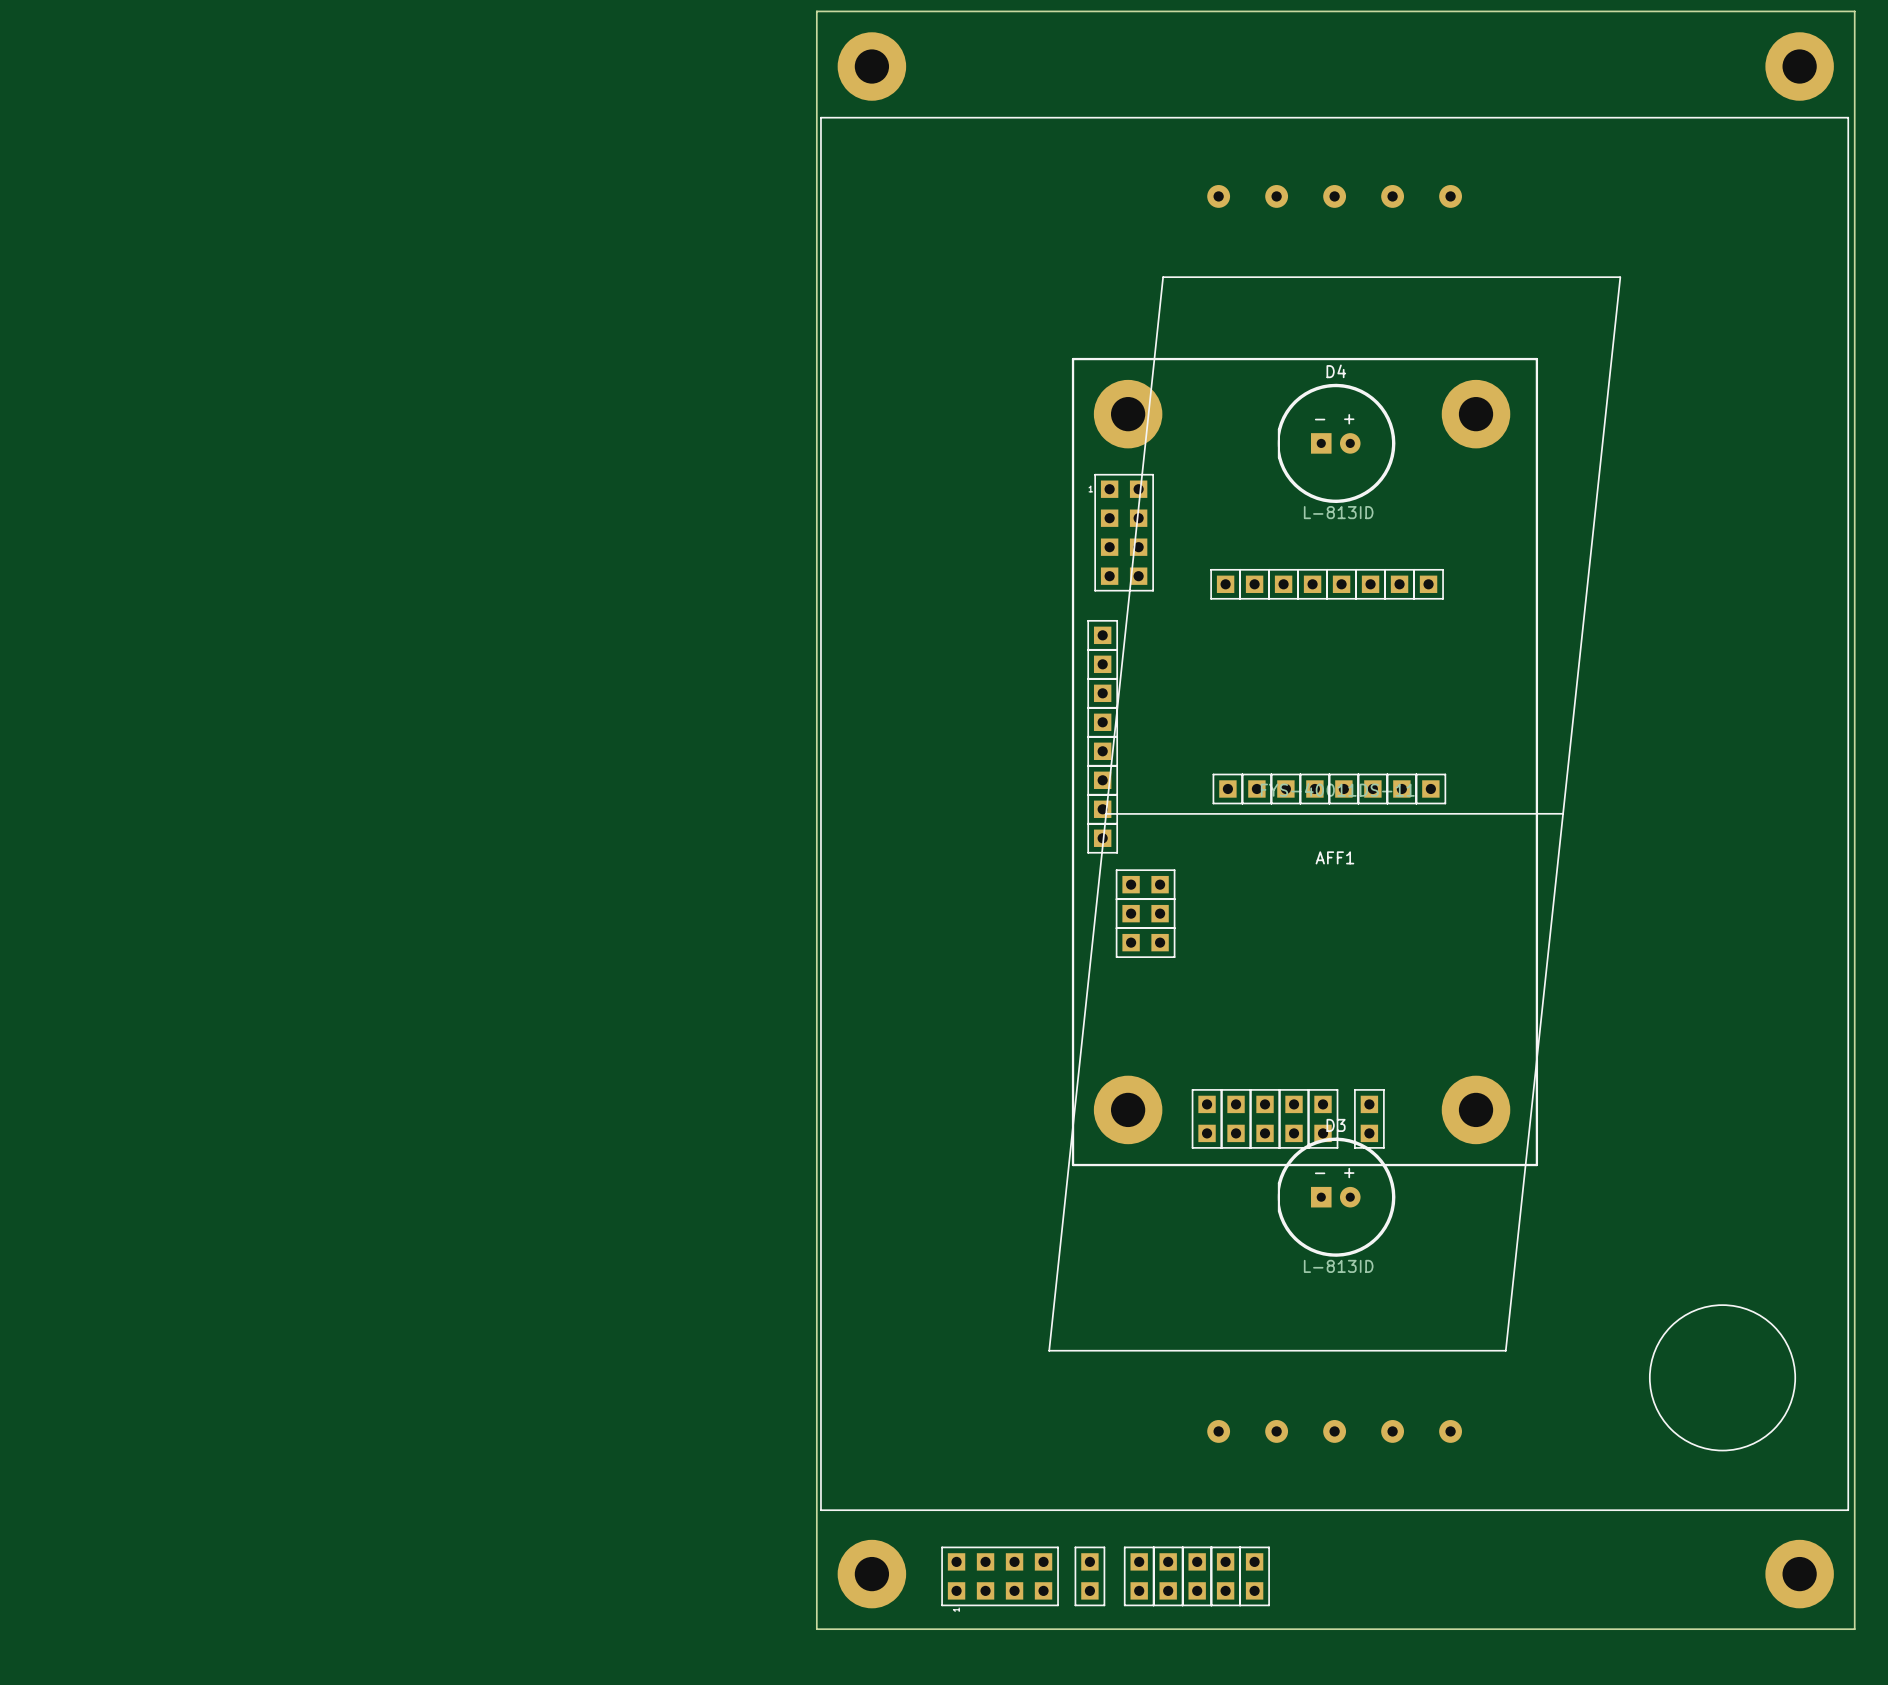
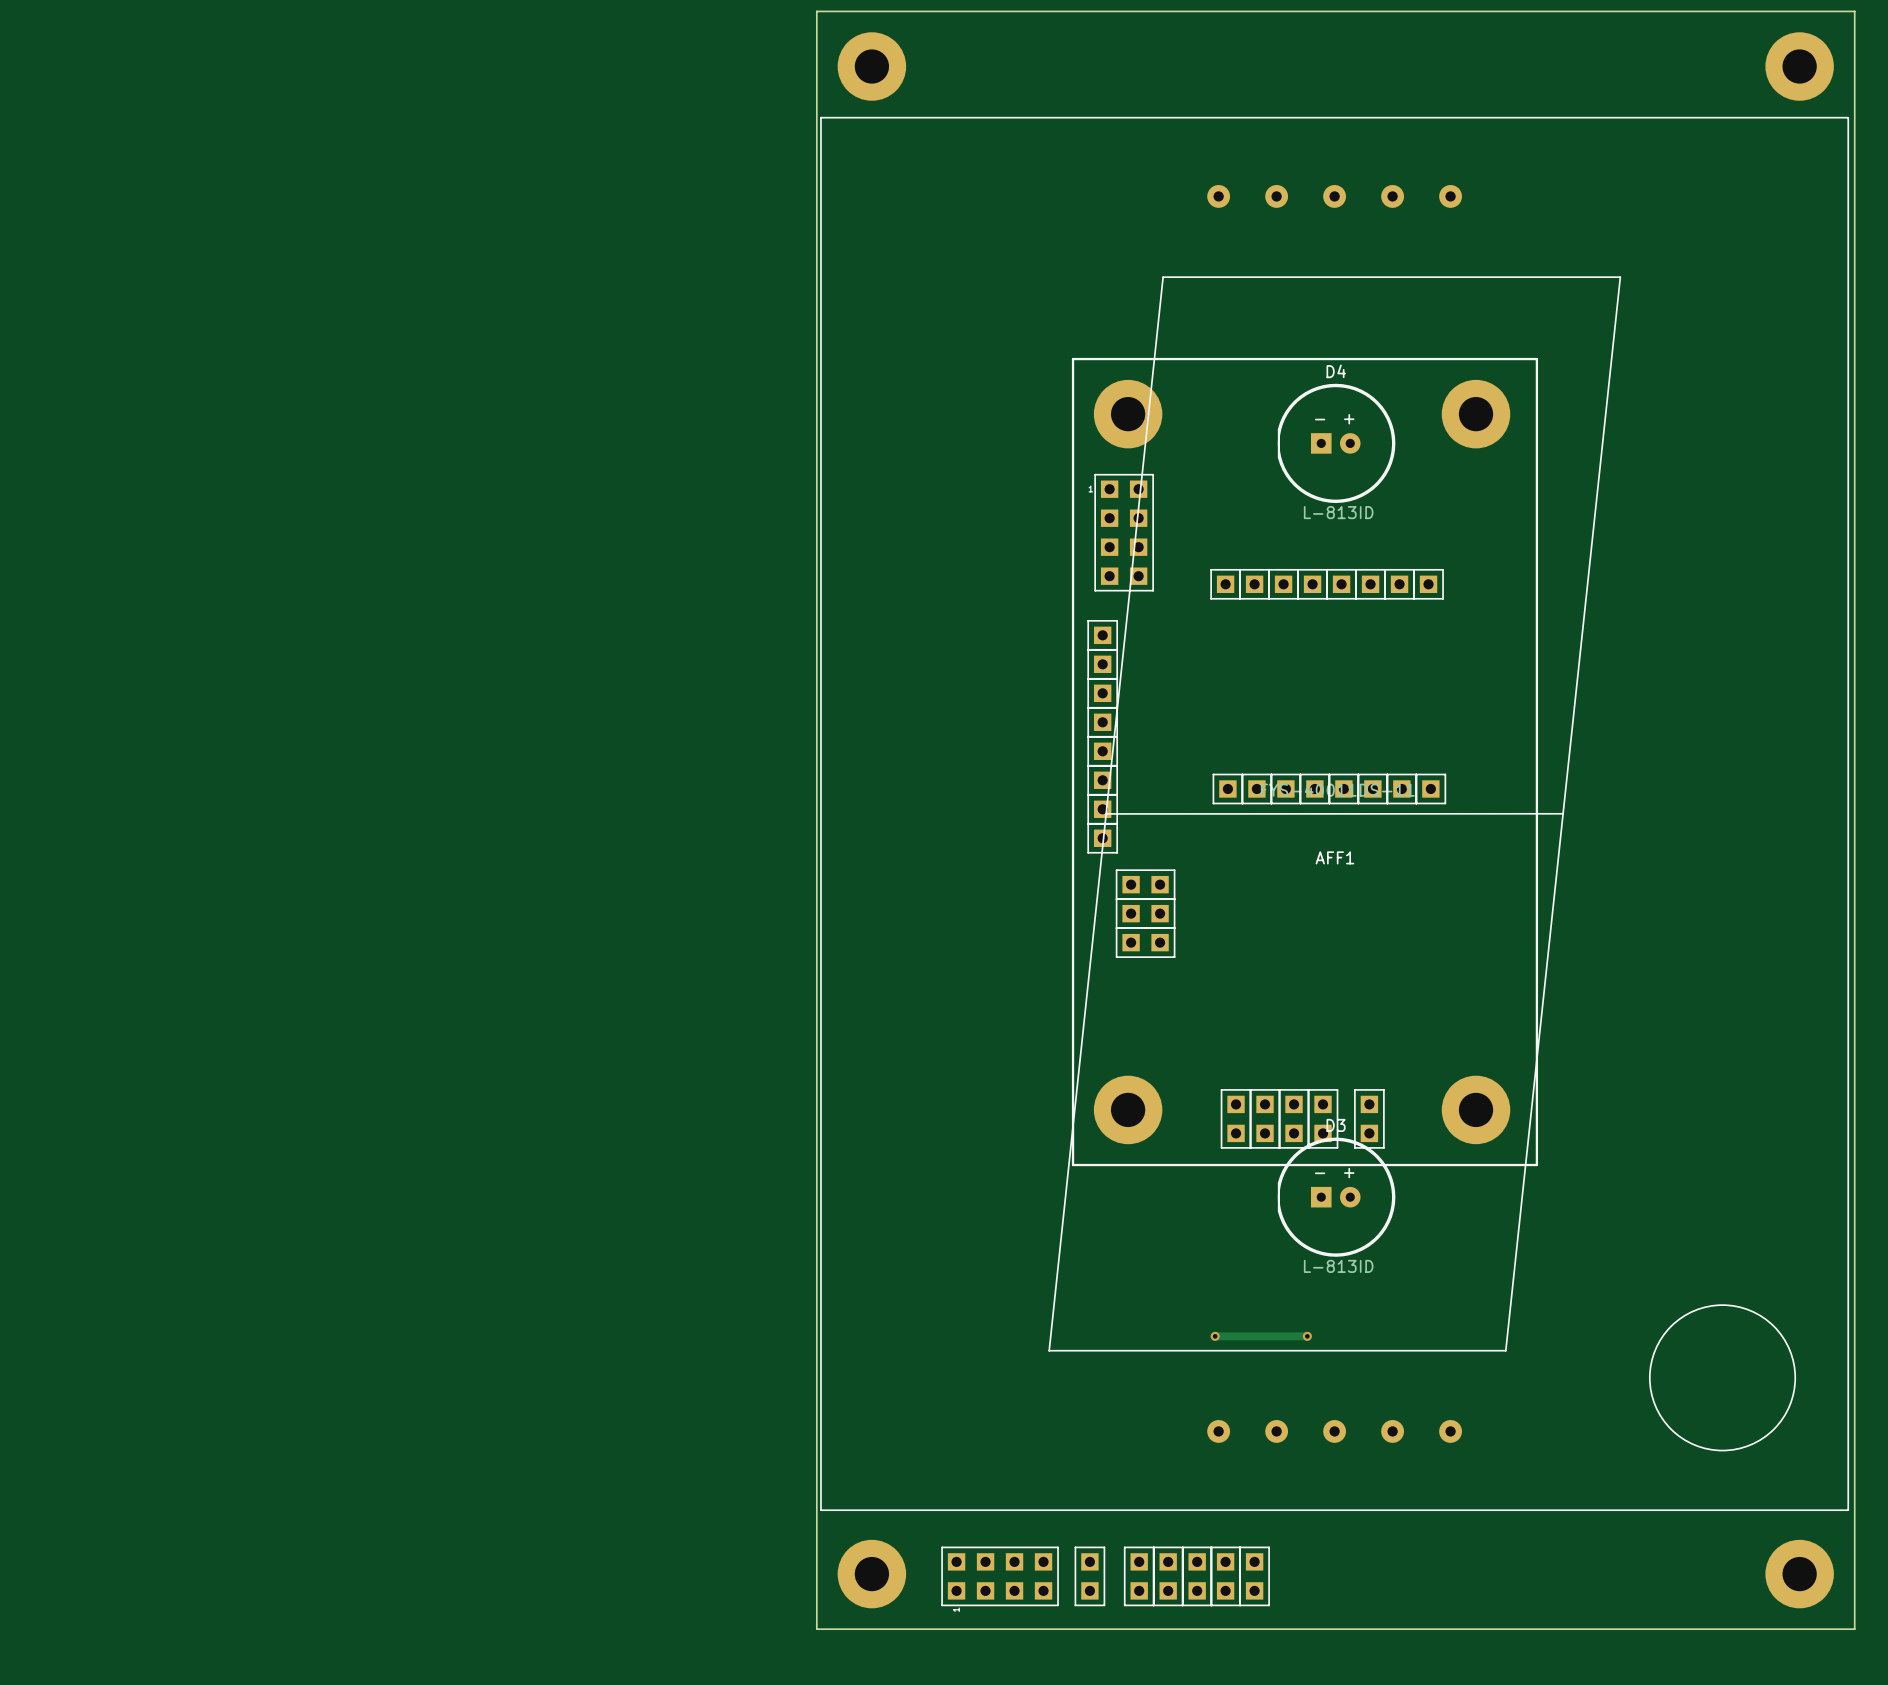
part: (1207, 1118) -> none
track: none -> (1215, 1336) (1307, 1336)
via: none -> (1215, 1336)
via: none -> (1307, 1336)

